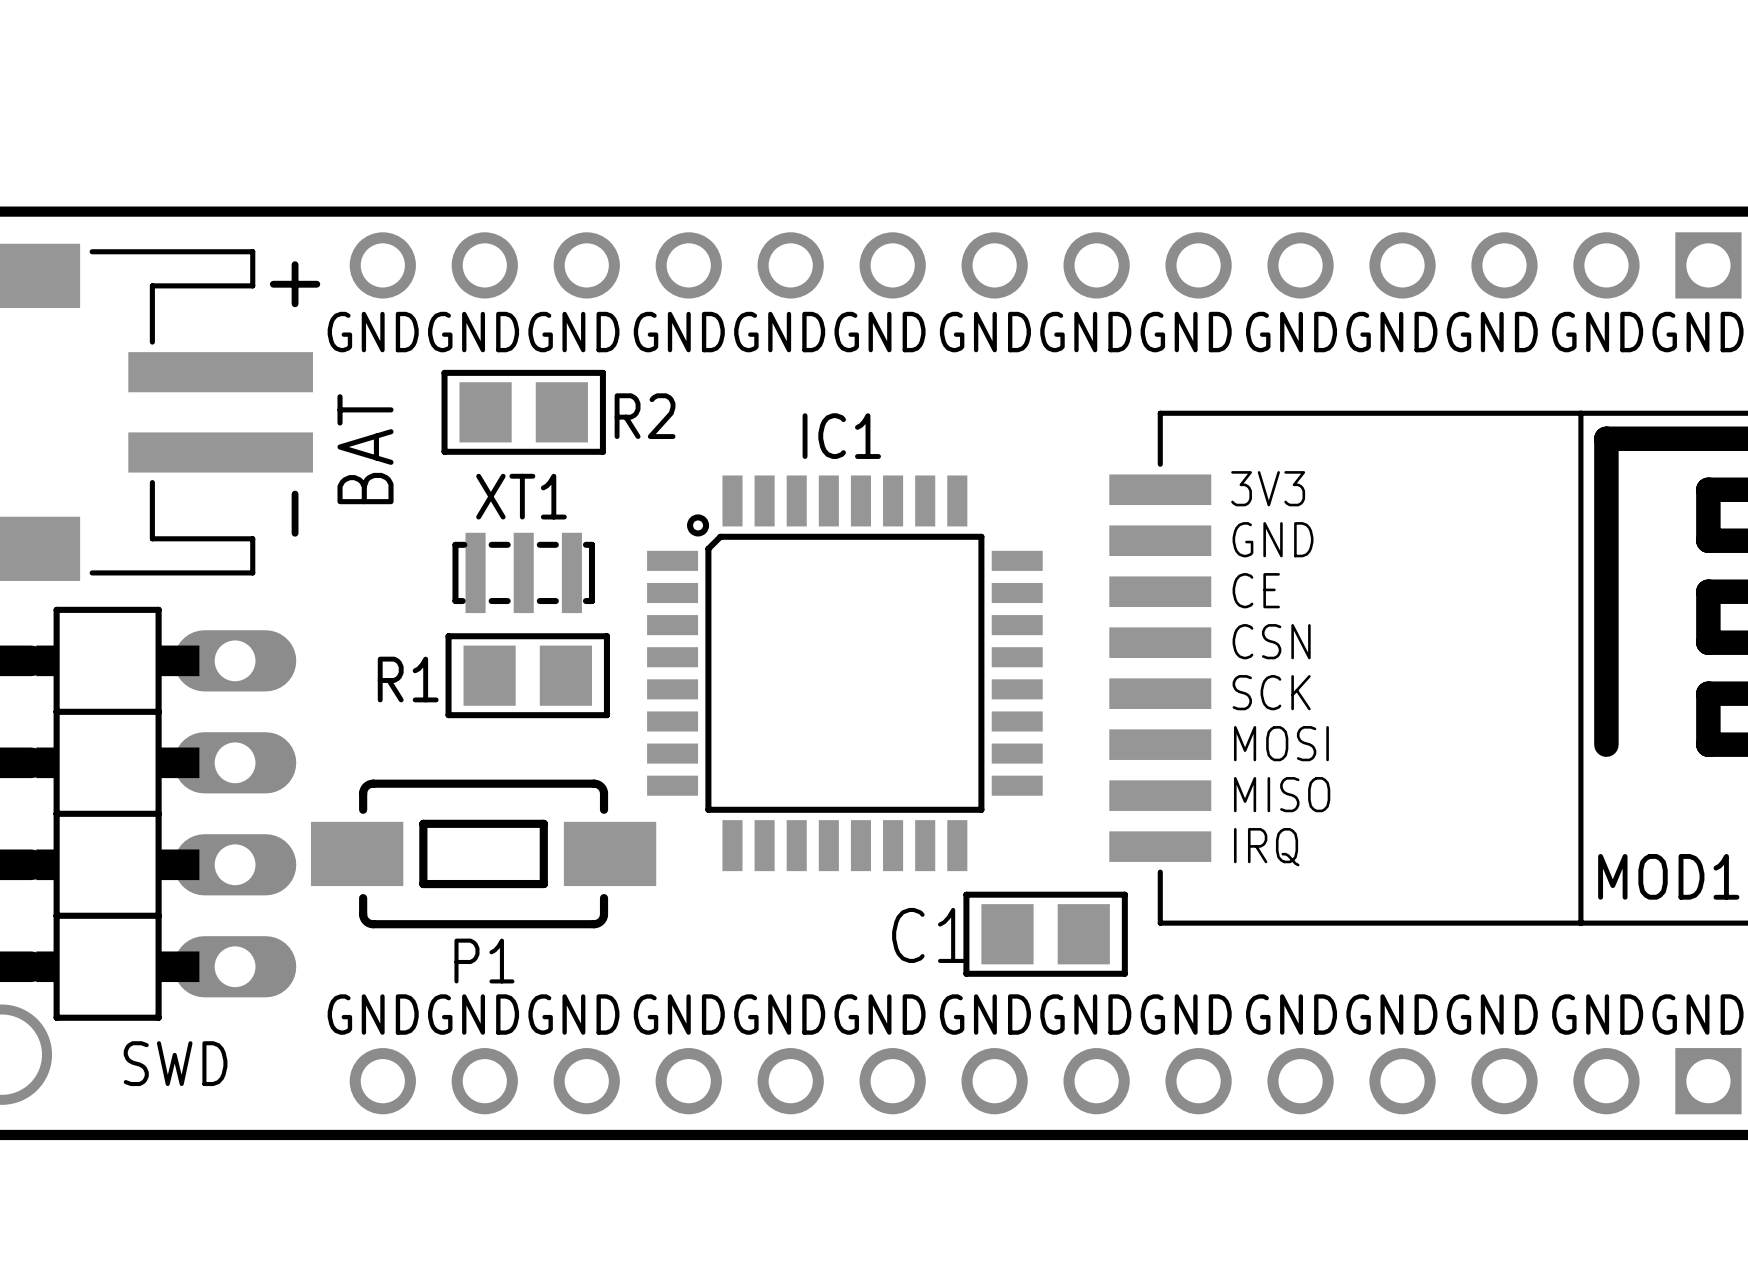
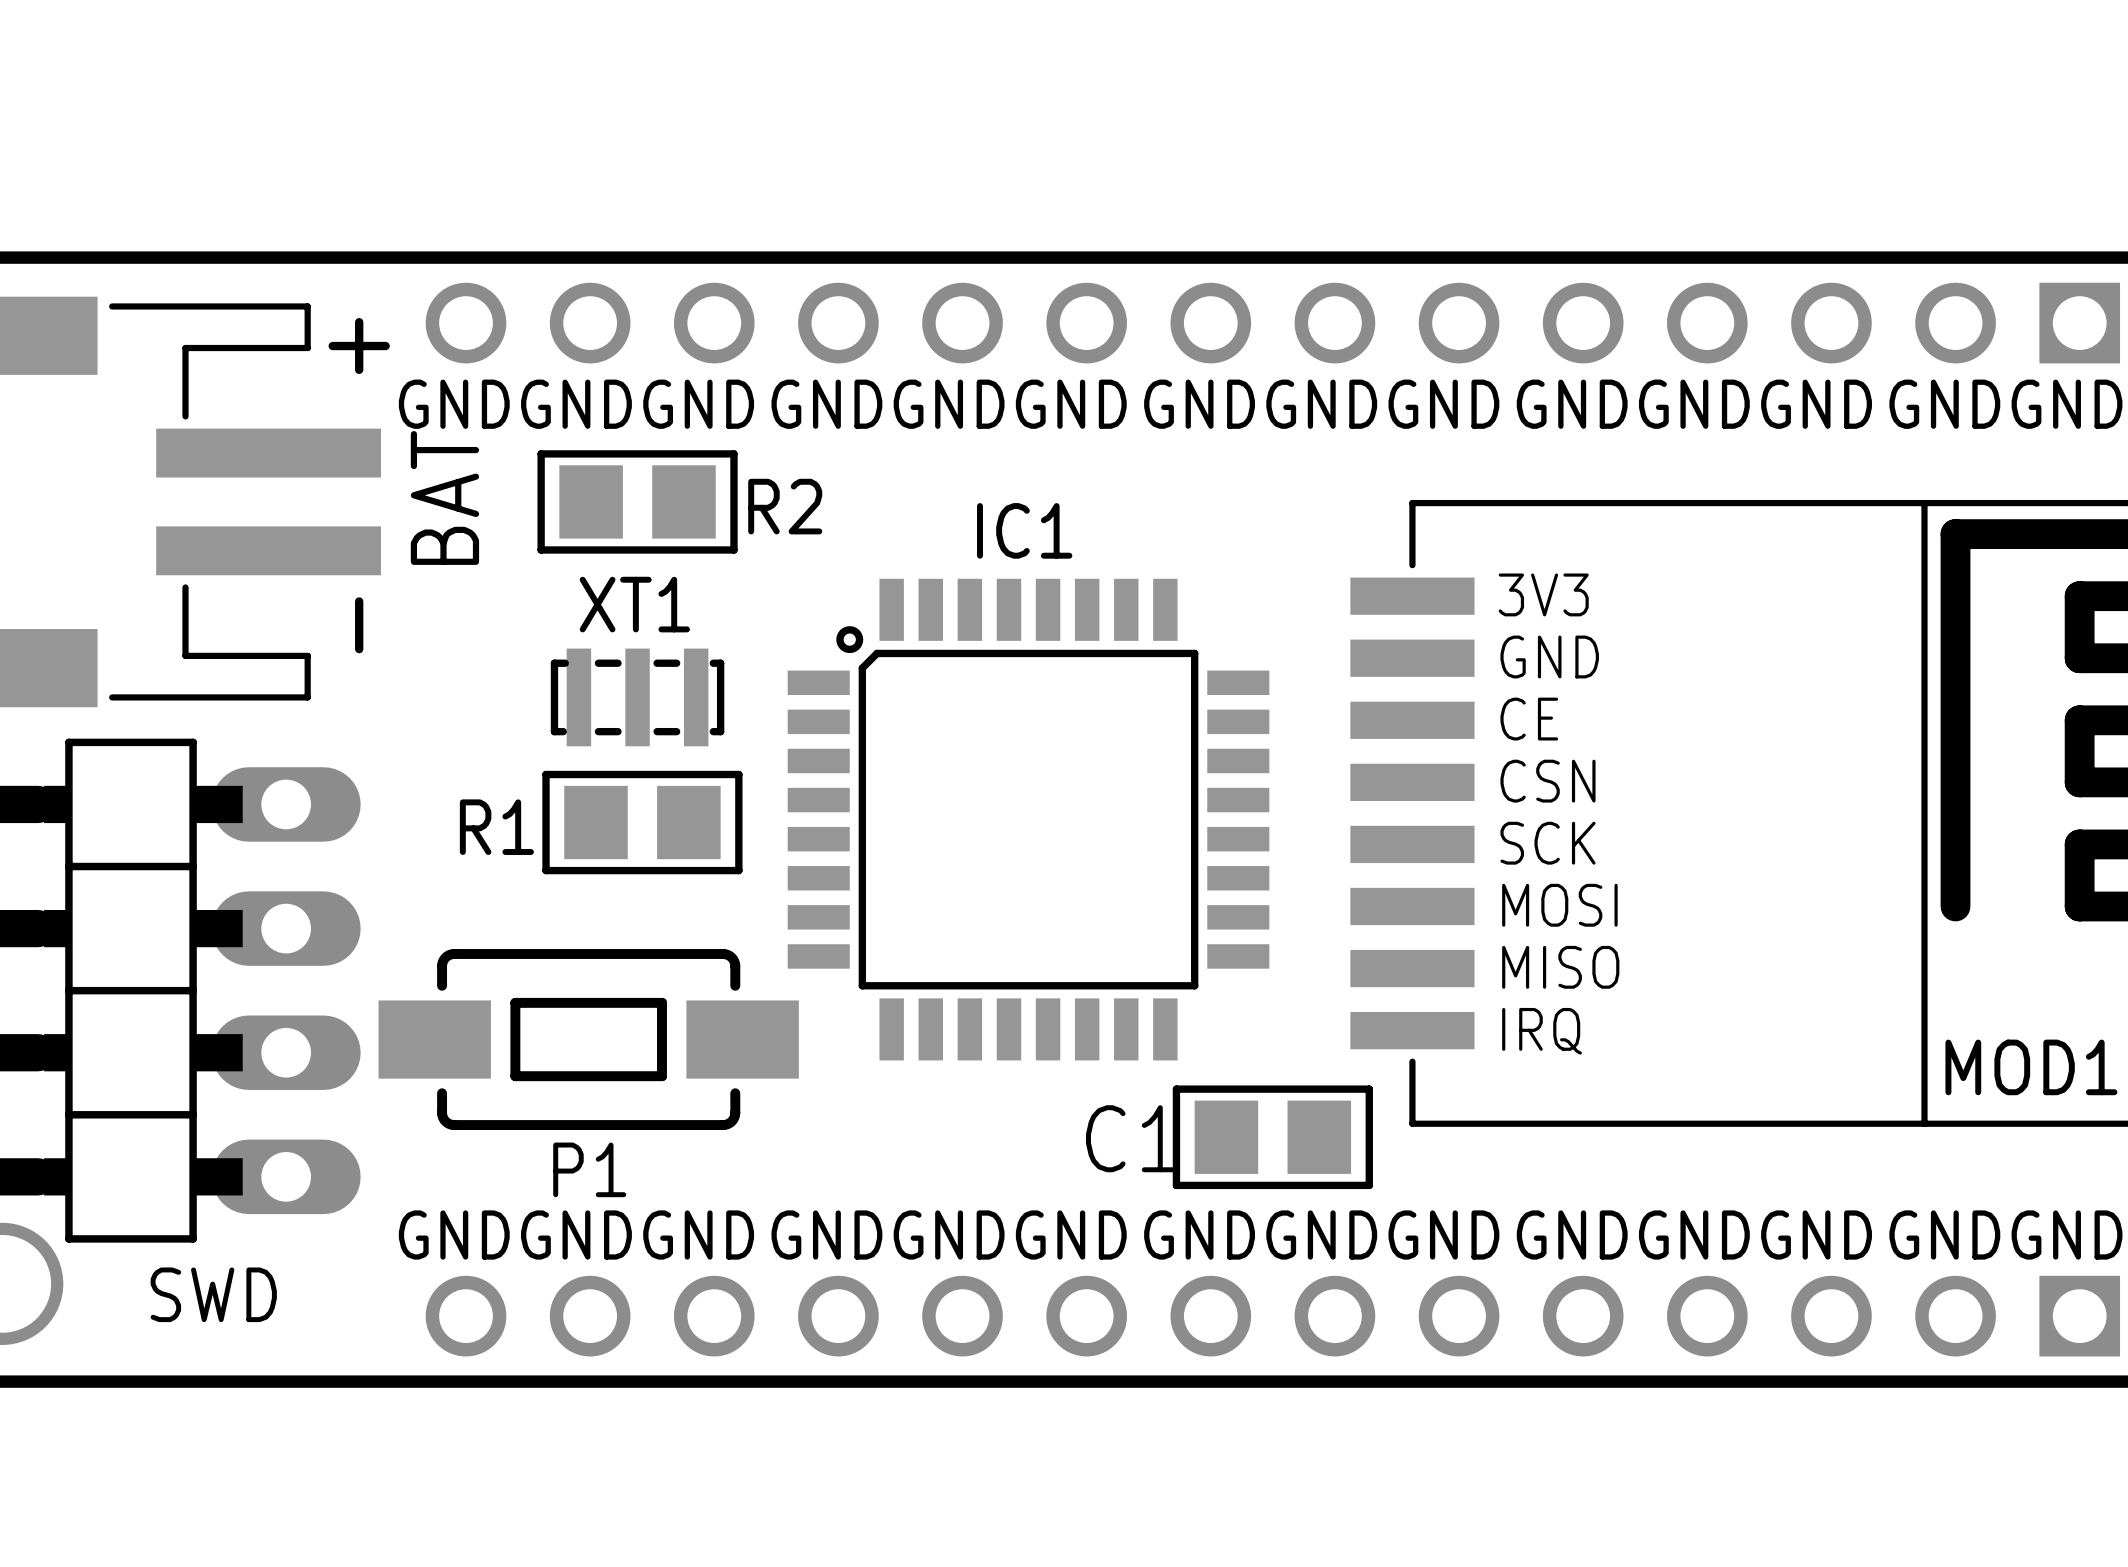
BAT name position: BAT (365, 449) -> BAT (444, 497)

